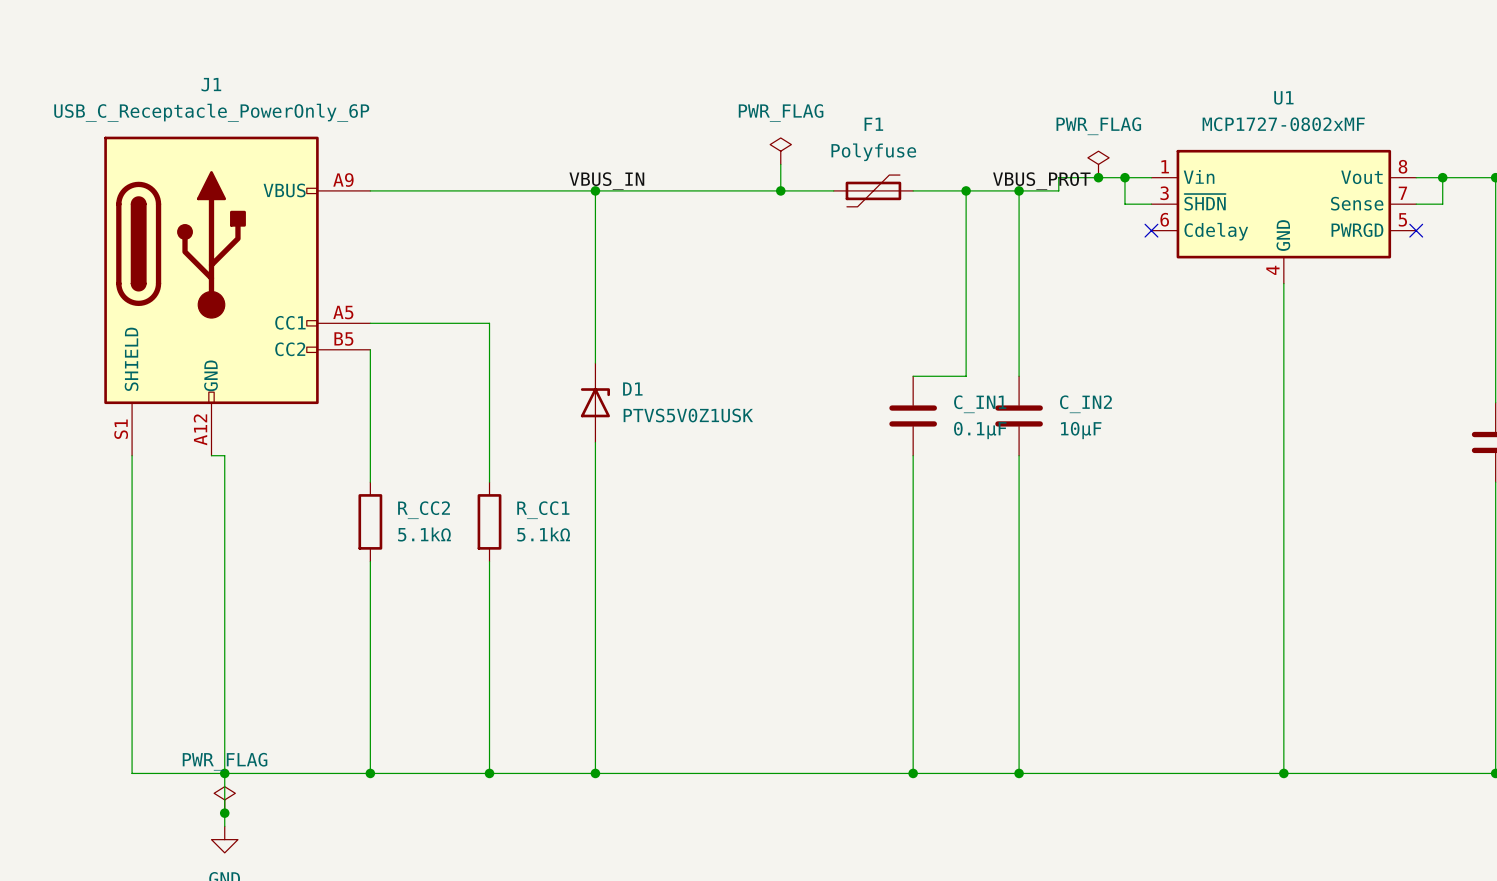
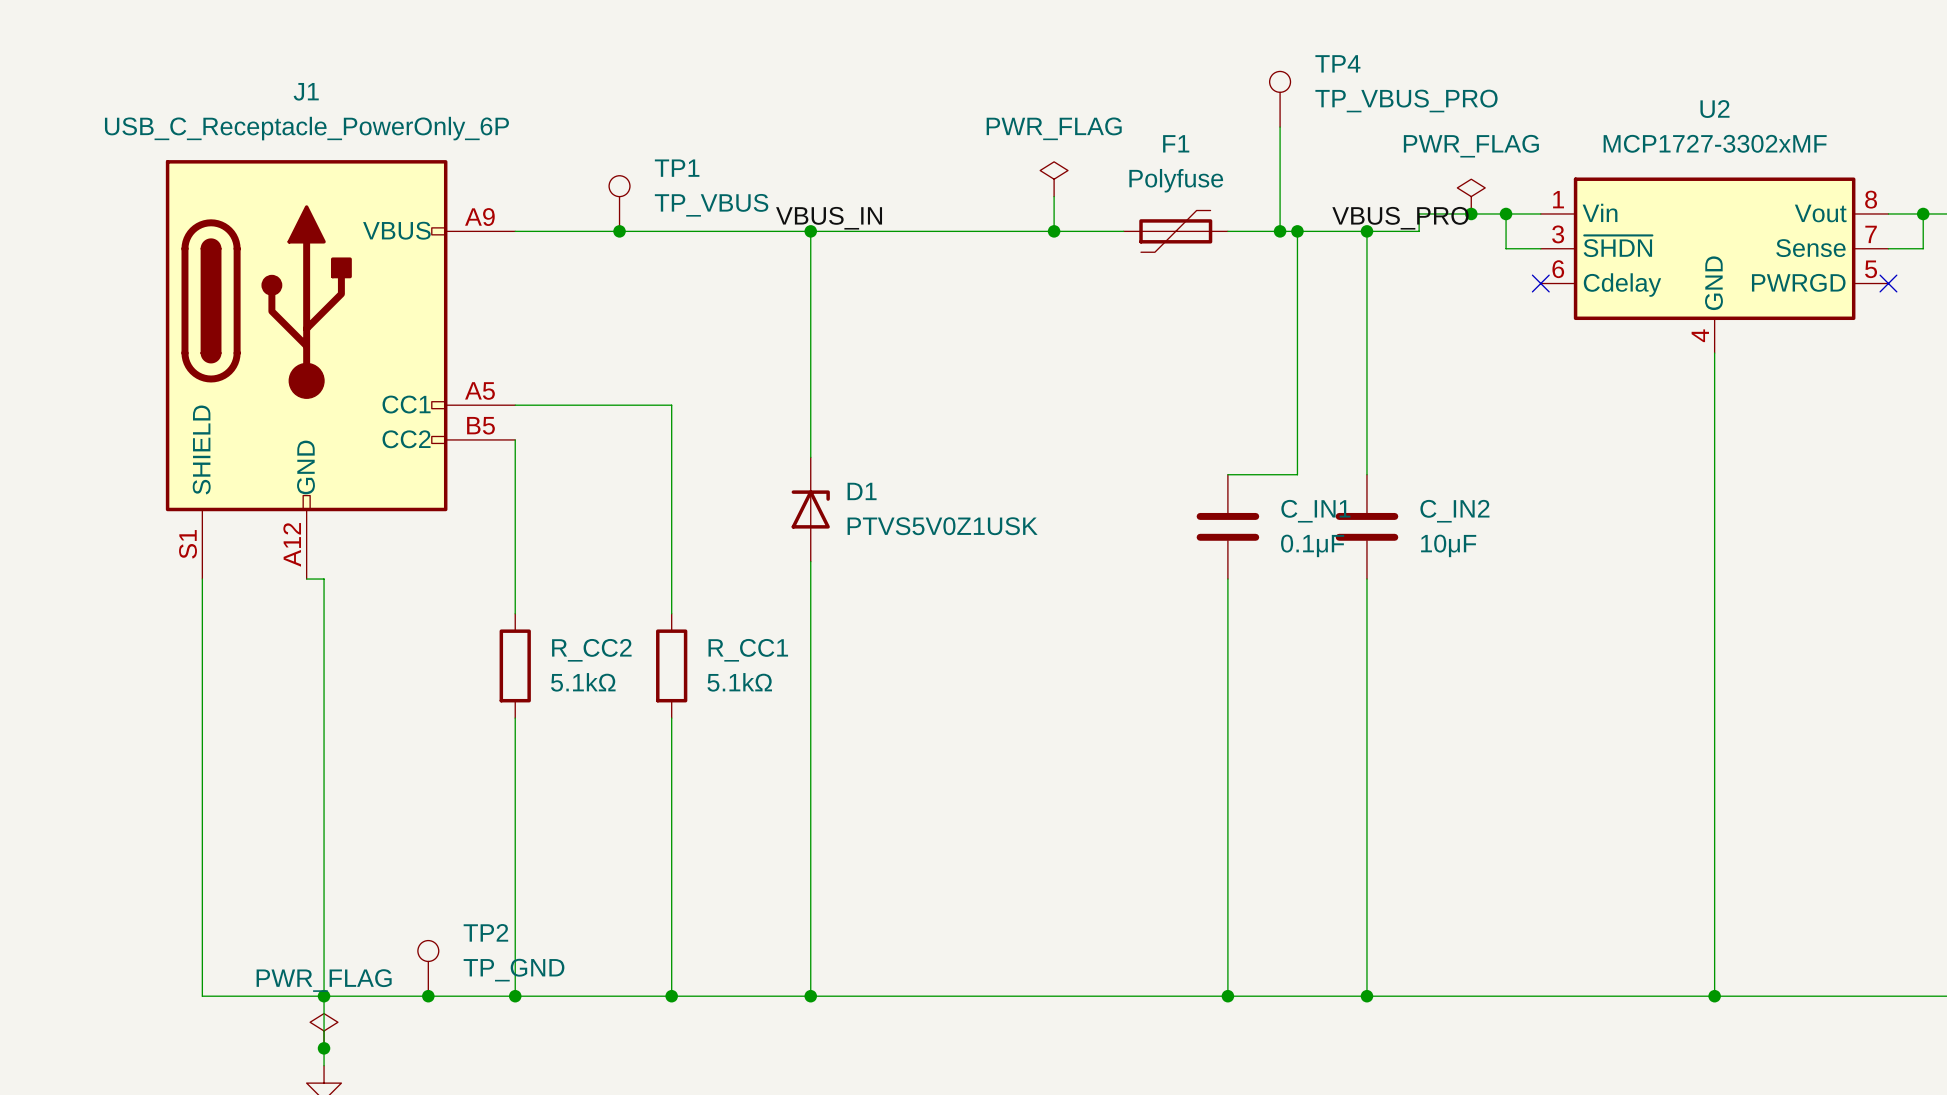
TP4: none -> TP_VBUS_PRO (1280, 99)
U1 name: U1 (1283, 97) -> U2 (1714, 109)
wire: none -> (1280, 127) (1280, 231)
U1 value: MCP1727-0802xMF (1283, 124) -> MCP1727-3302xMF (1715, 143)
TP1: none -> TP_VBUS (619, 203)
label: VBUS_PROT (1041, 181) -> VBUS_PRO (1400, 218)
junction: none -> (619, 231)
junction: none -> (1280, 231)
TP2: none -> TP_GND (428, 968)
junction: none -> (428, 996)

